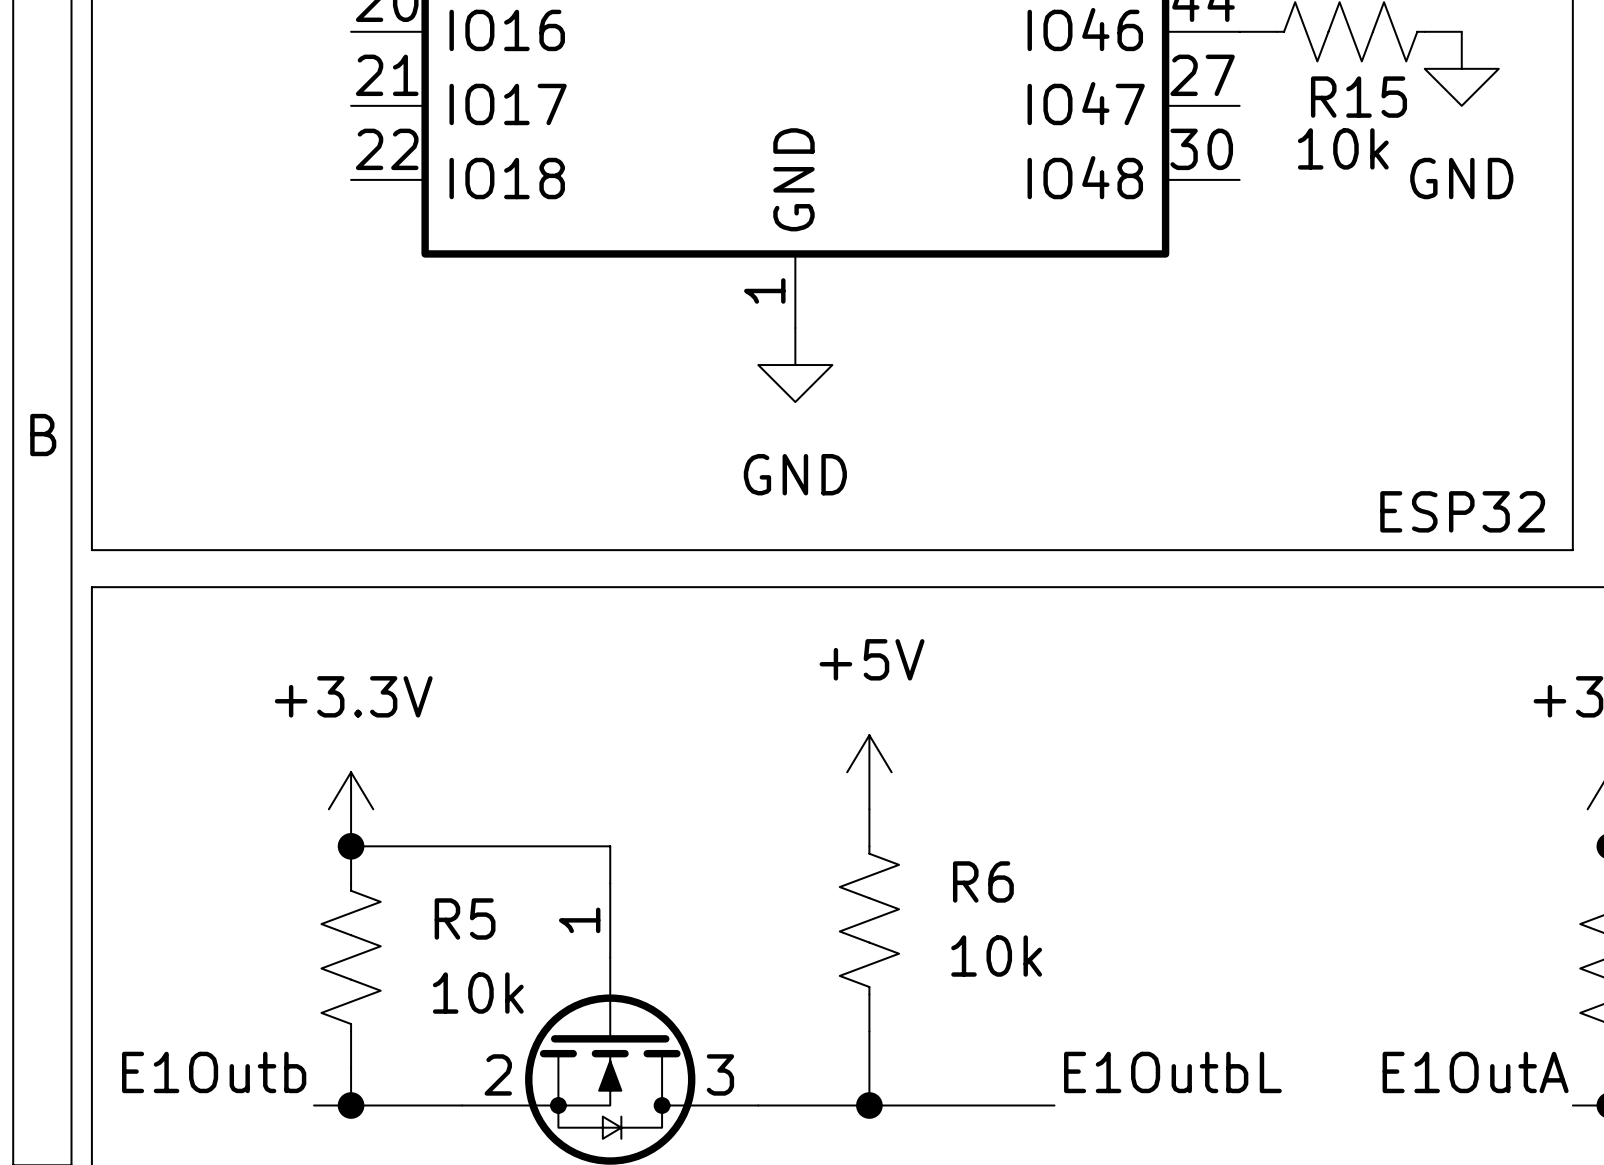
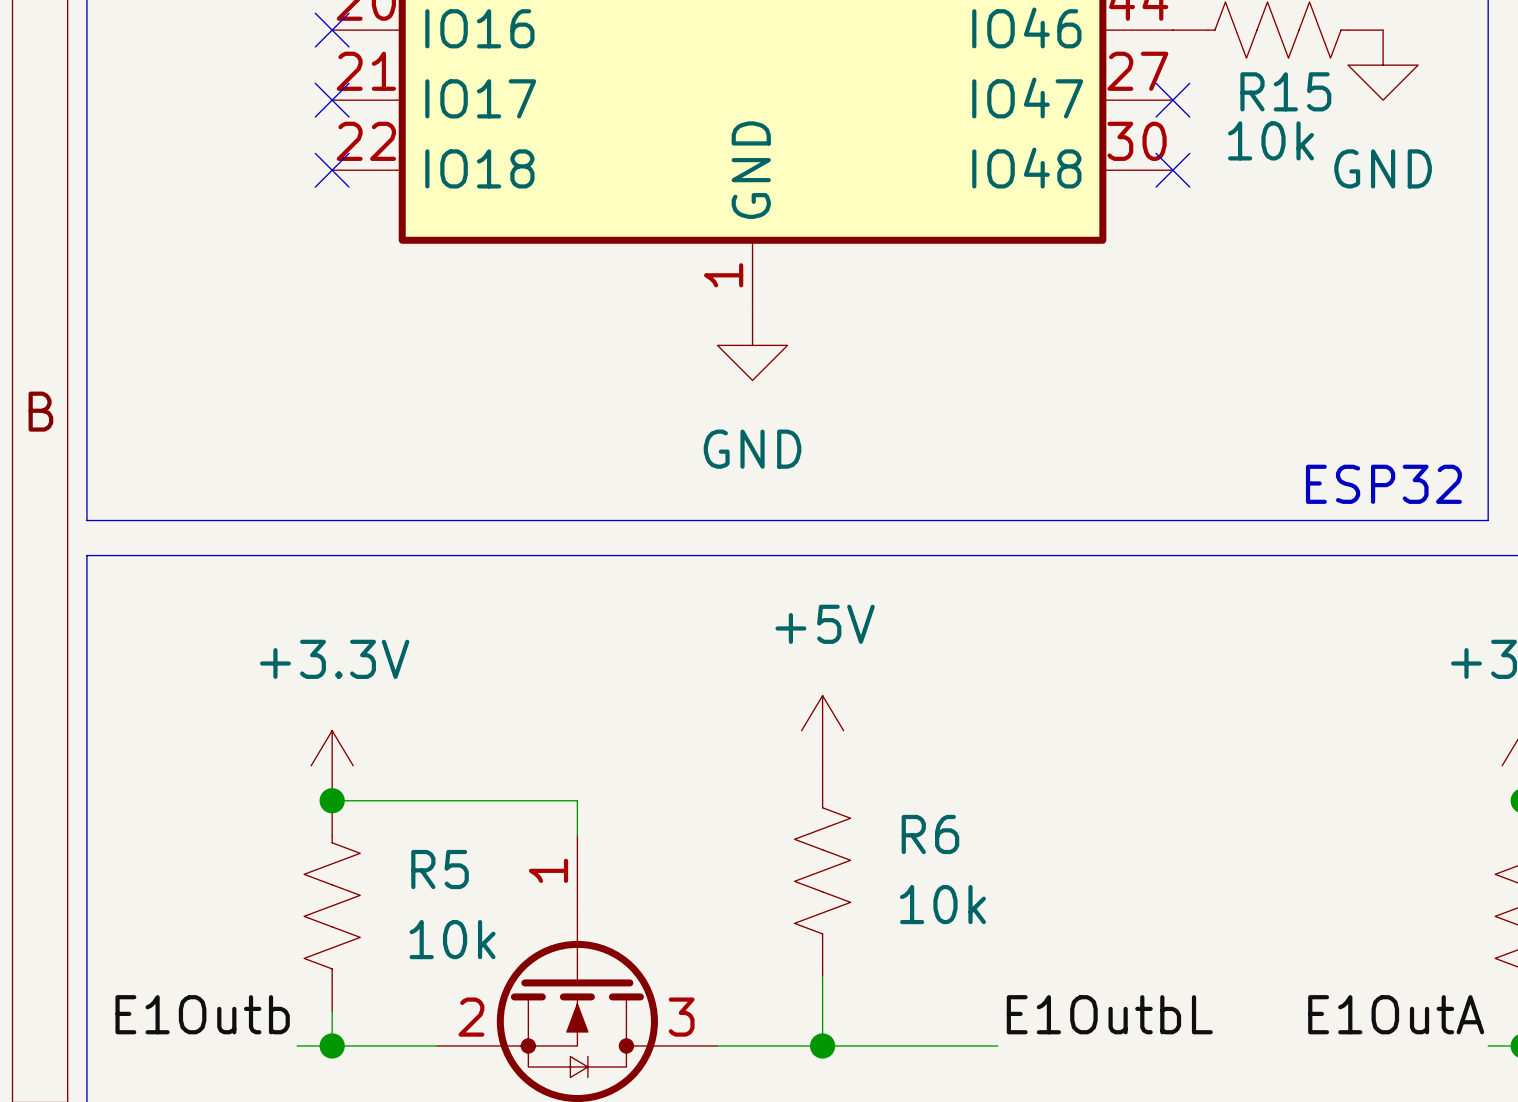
no-connect mark: none -> (332, 30)
no-connect mark: none -> (332, 100)
no-connect mark: none -> (1172, 100)
no-connect mark: none -> (332, 170)
no-connect mark: none -> (1172, 170)

